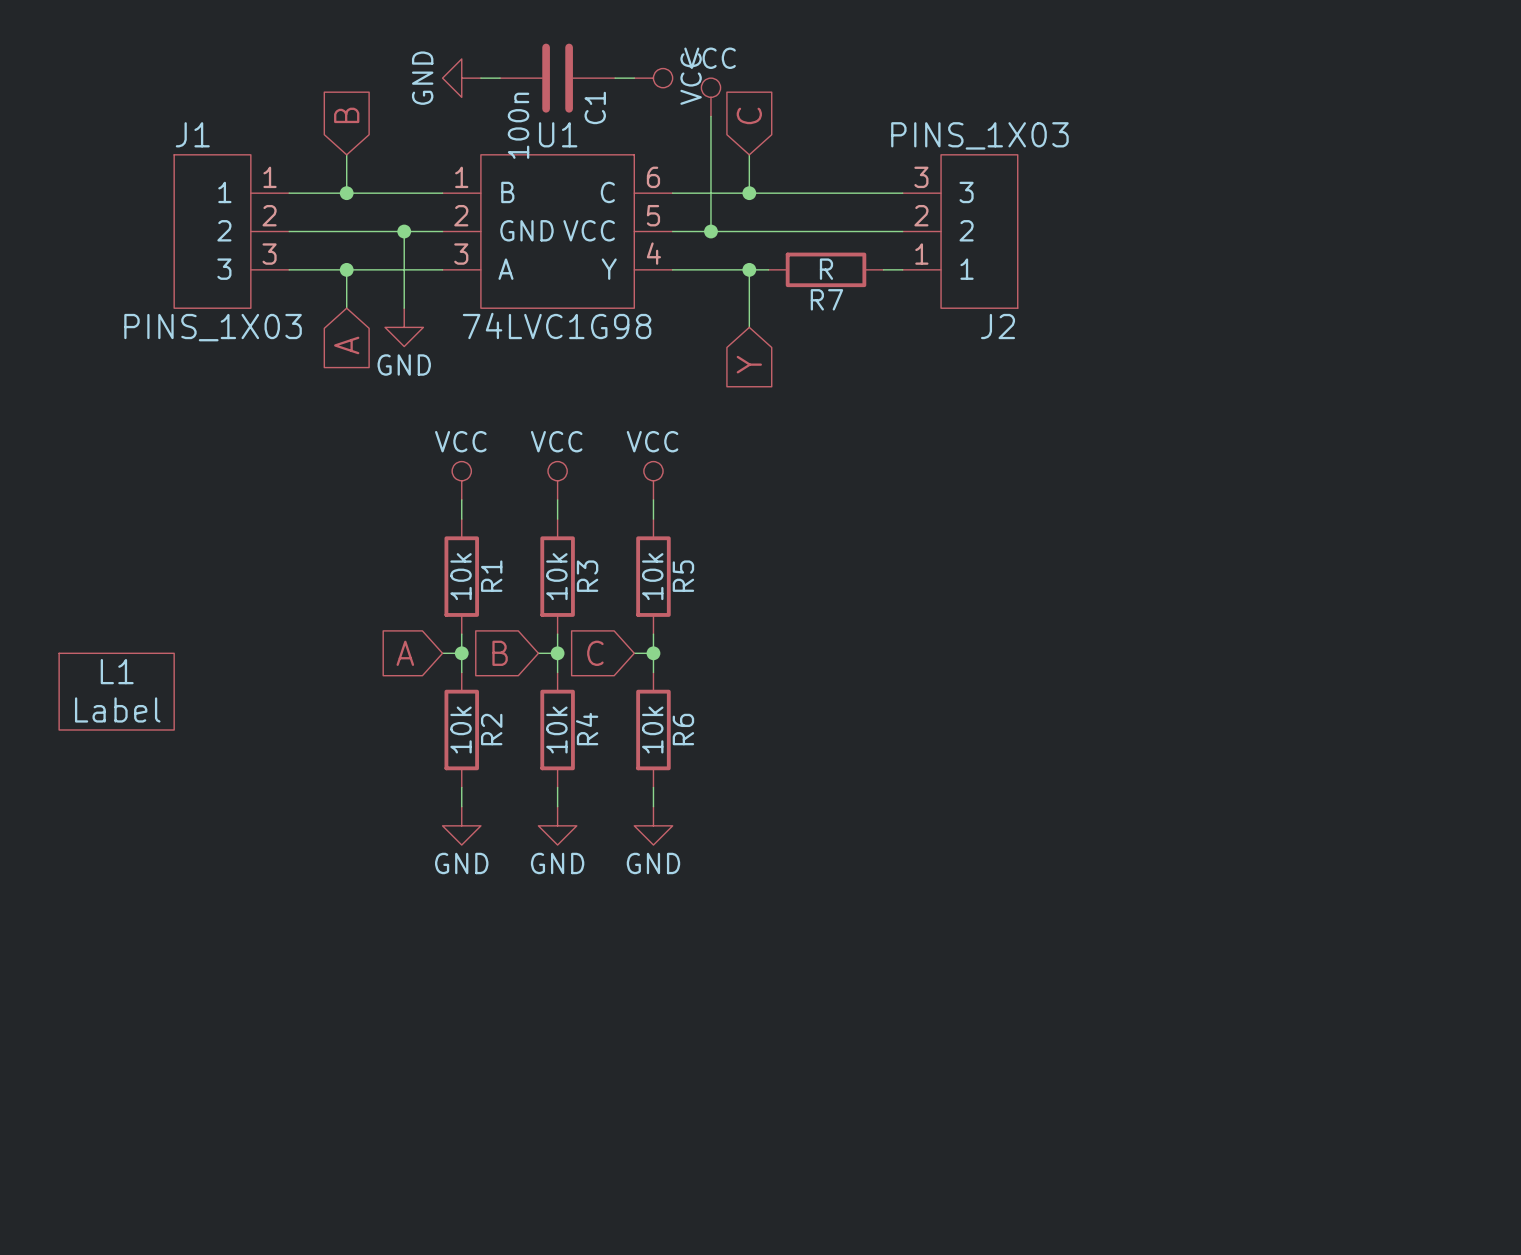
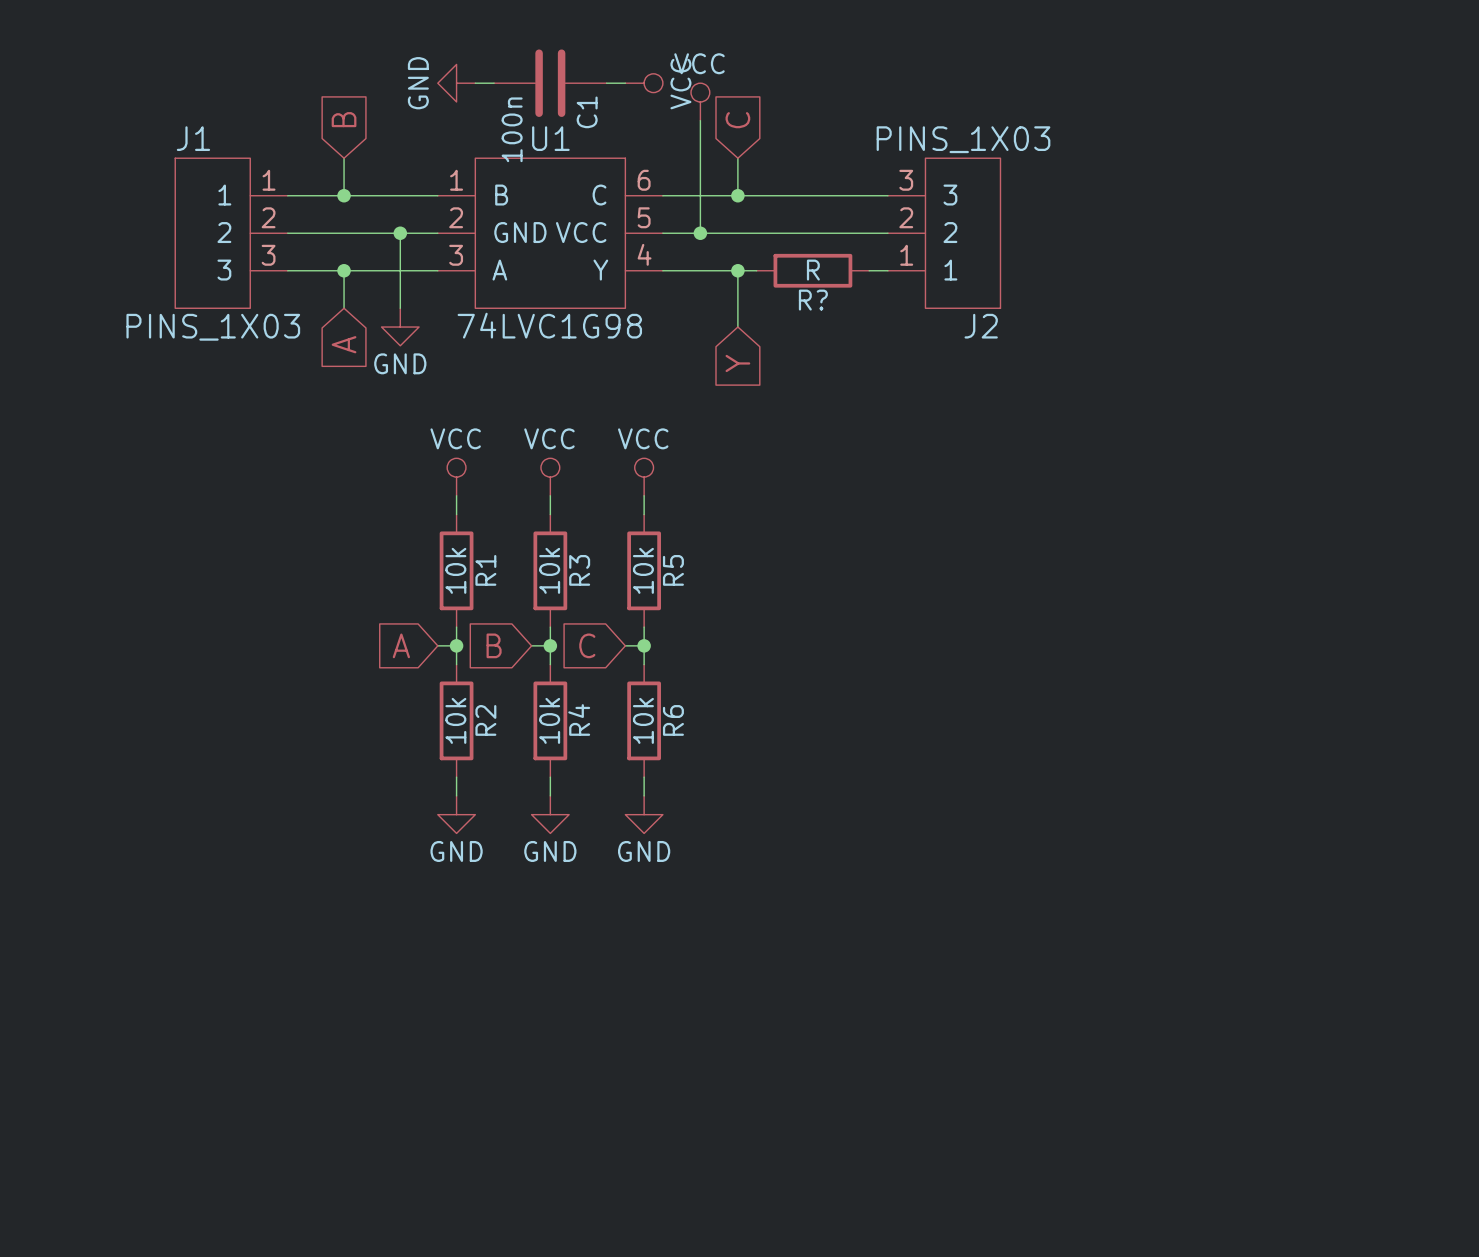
R7 name: R7 (826, 299) -> R? (813, 300)
L1: Label (116, 691) -> none

